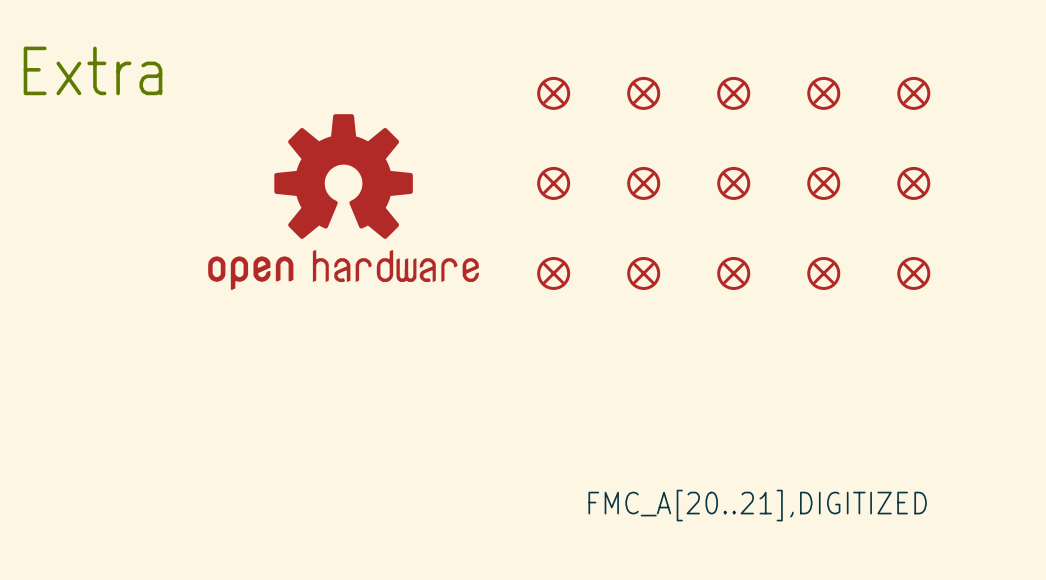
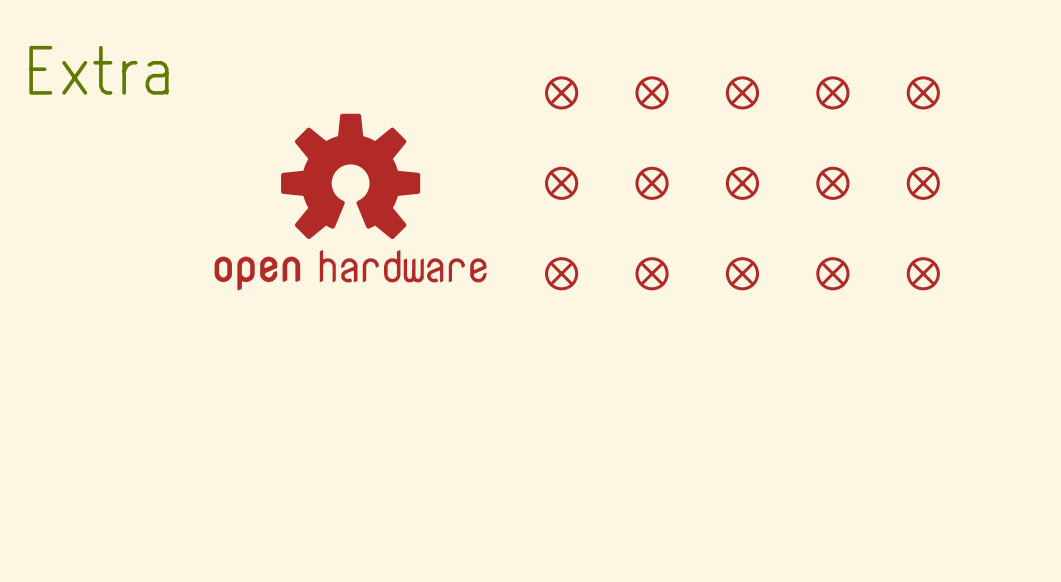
label: FMC_A[20..21],DIGITIZED (757, 505) -> none

